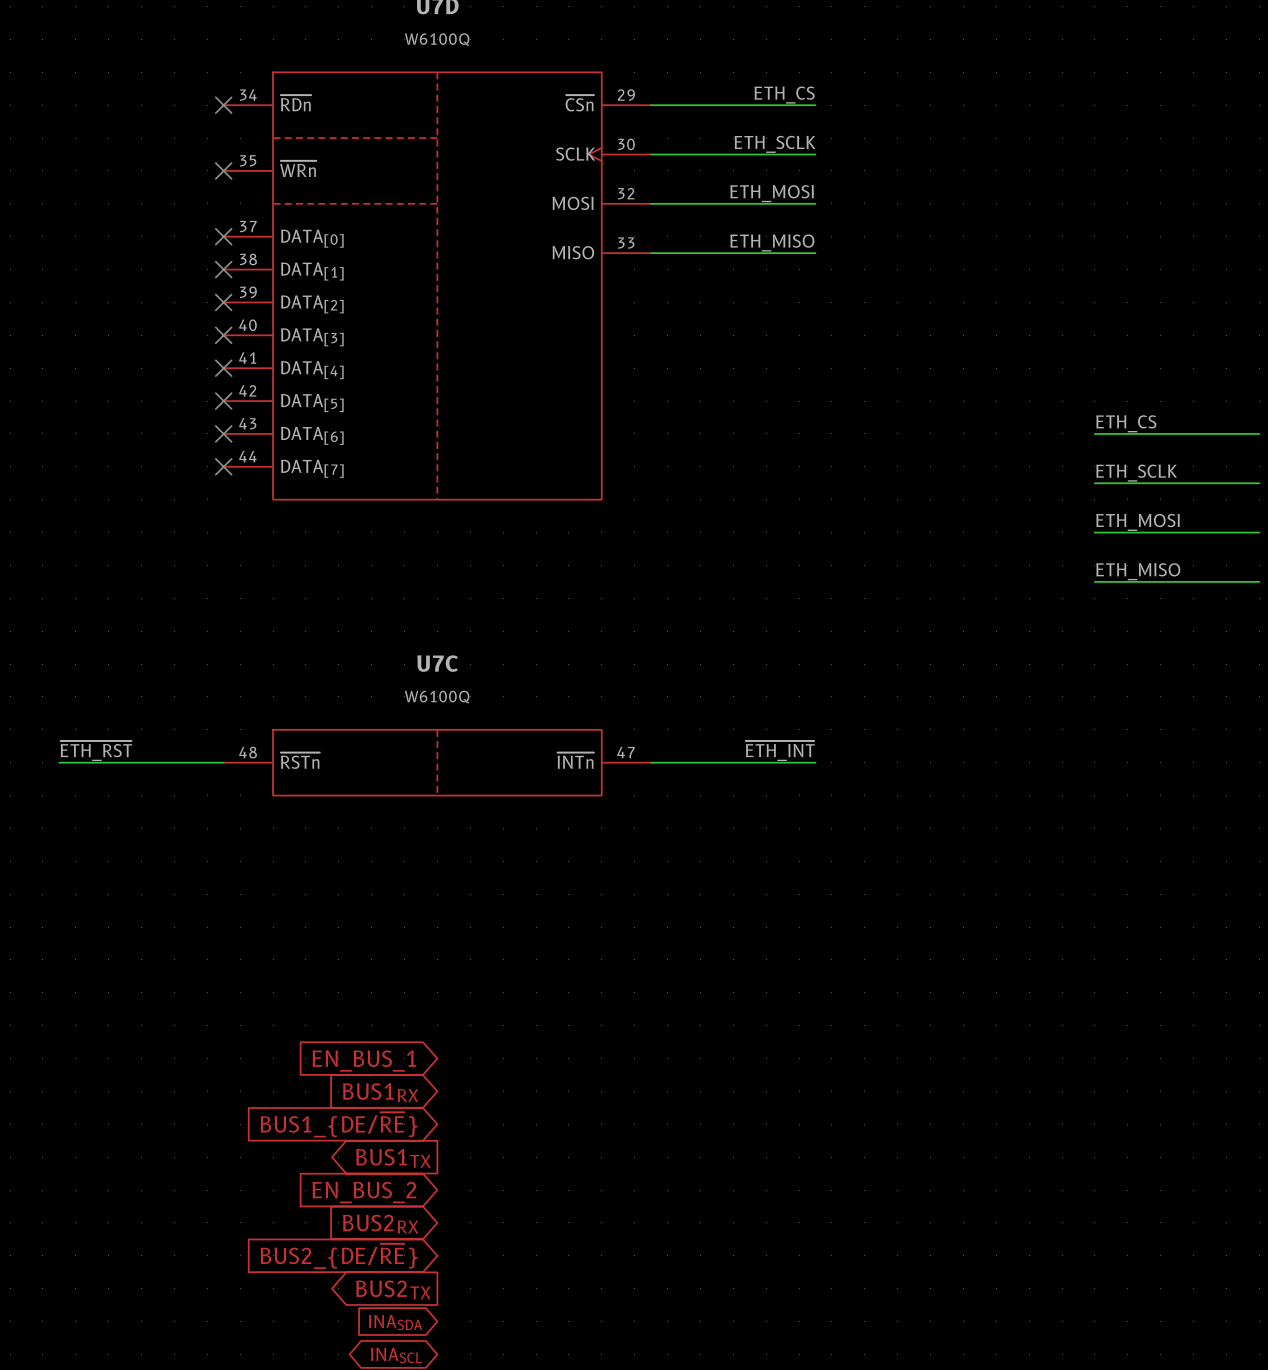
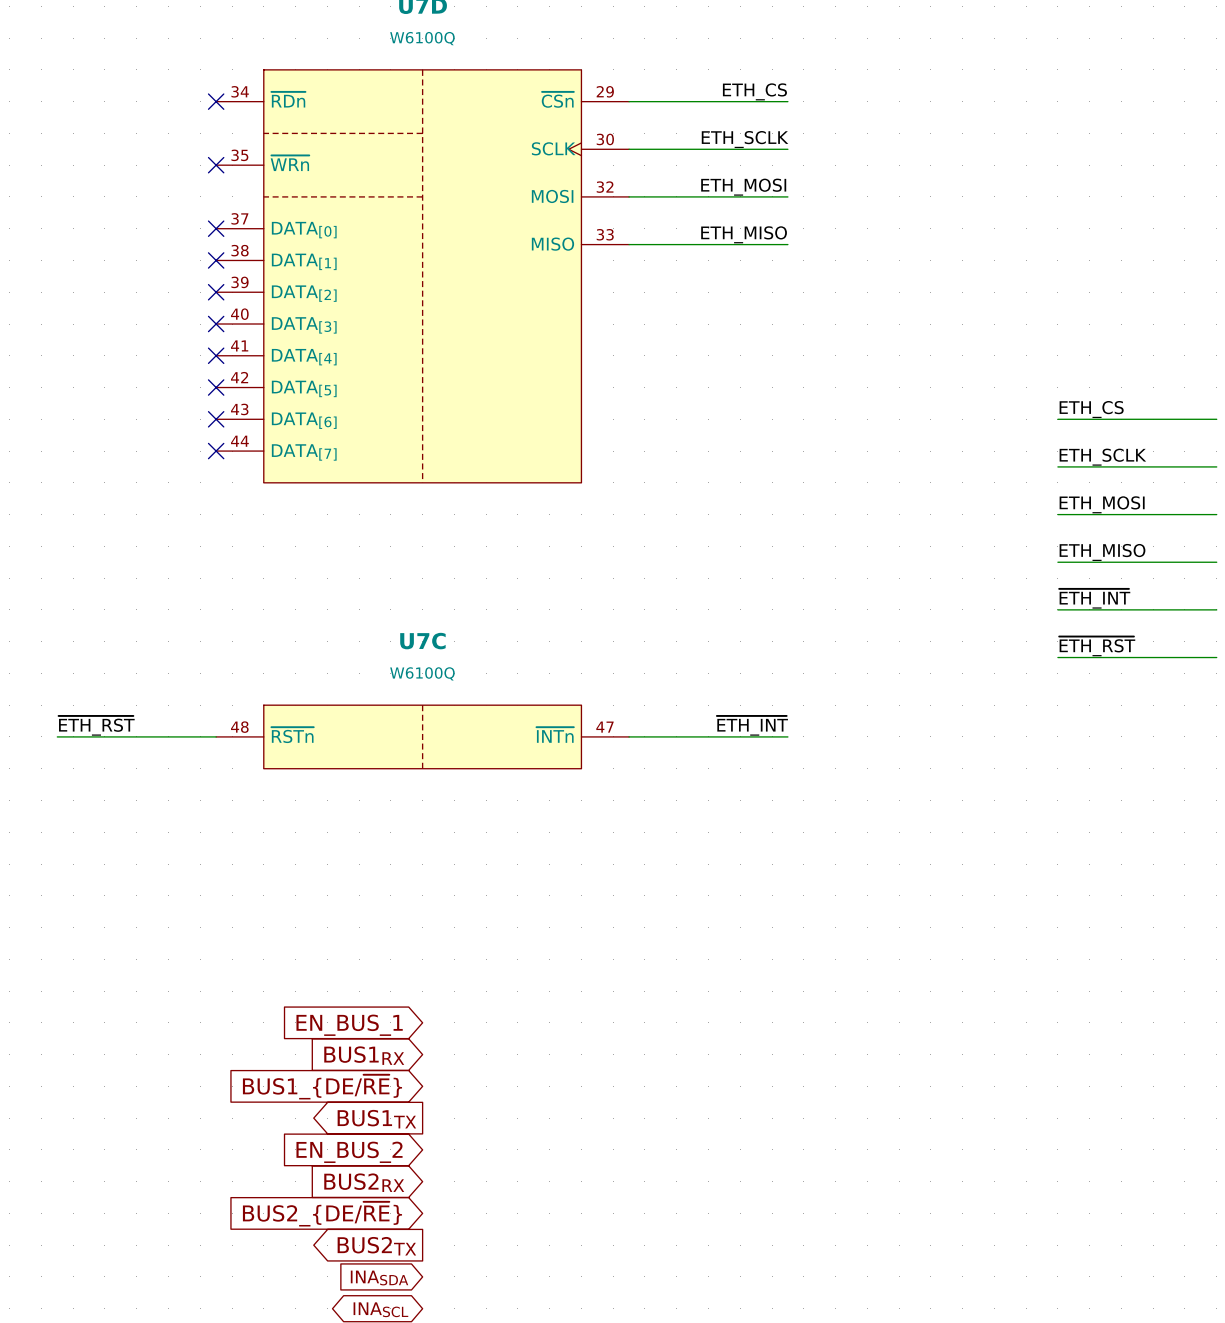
label: none -> ~{ETH_INT} (1094, 598)
wire: none -> (1057, 609) (1216, 609)
label: none -> ~{ETH_RST} (1097, 646)
wire: none -> (1057, 657) (1216, 657)

